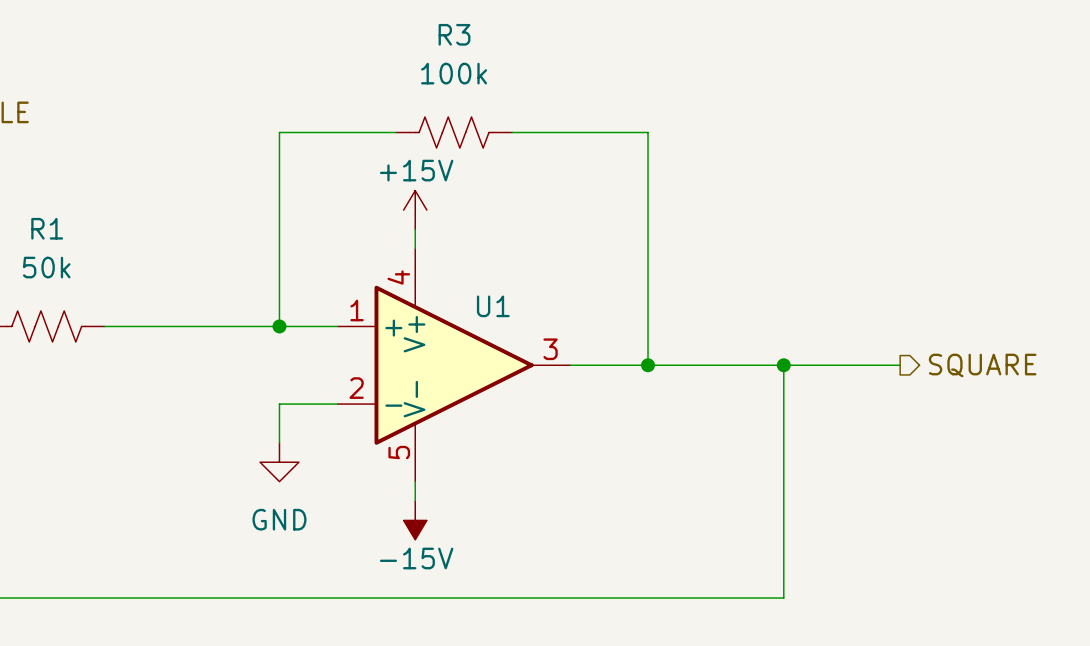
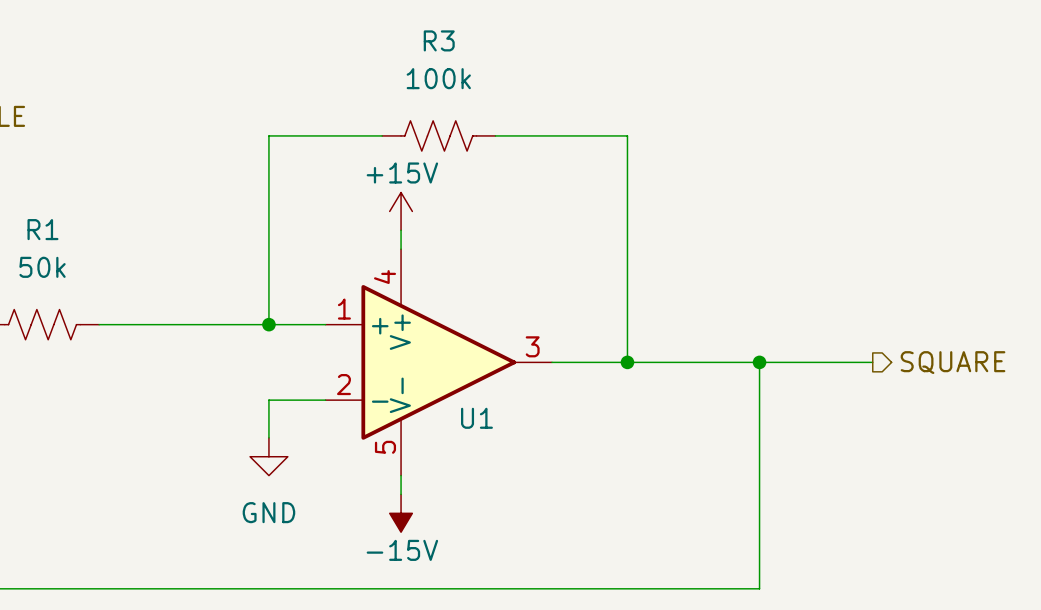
U1 name position: U1 (493, 306) -> U1 (476, 418)

